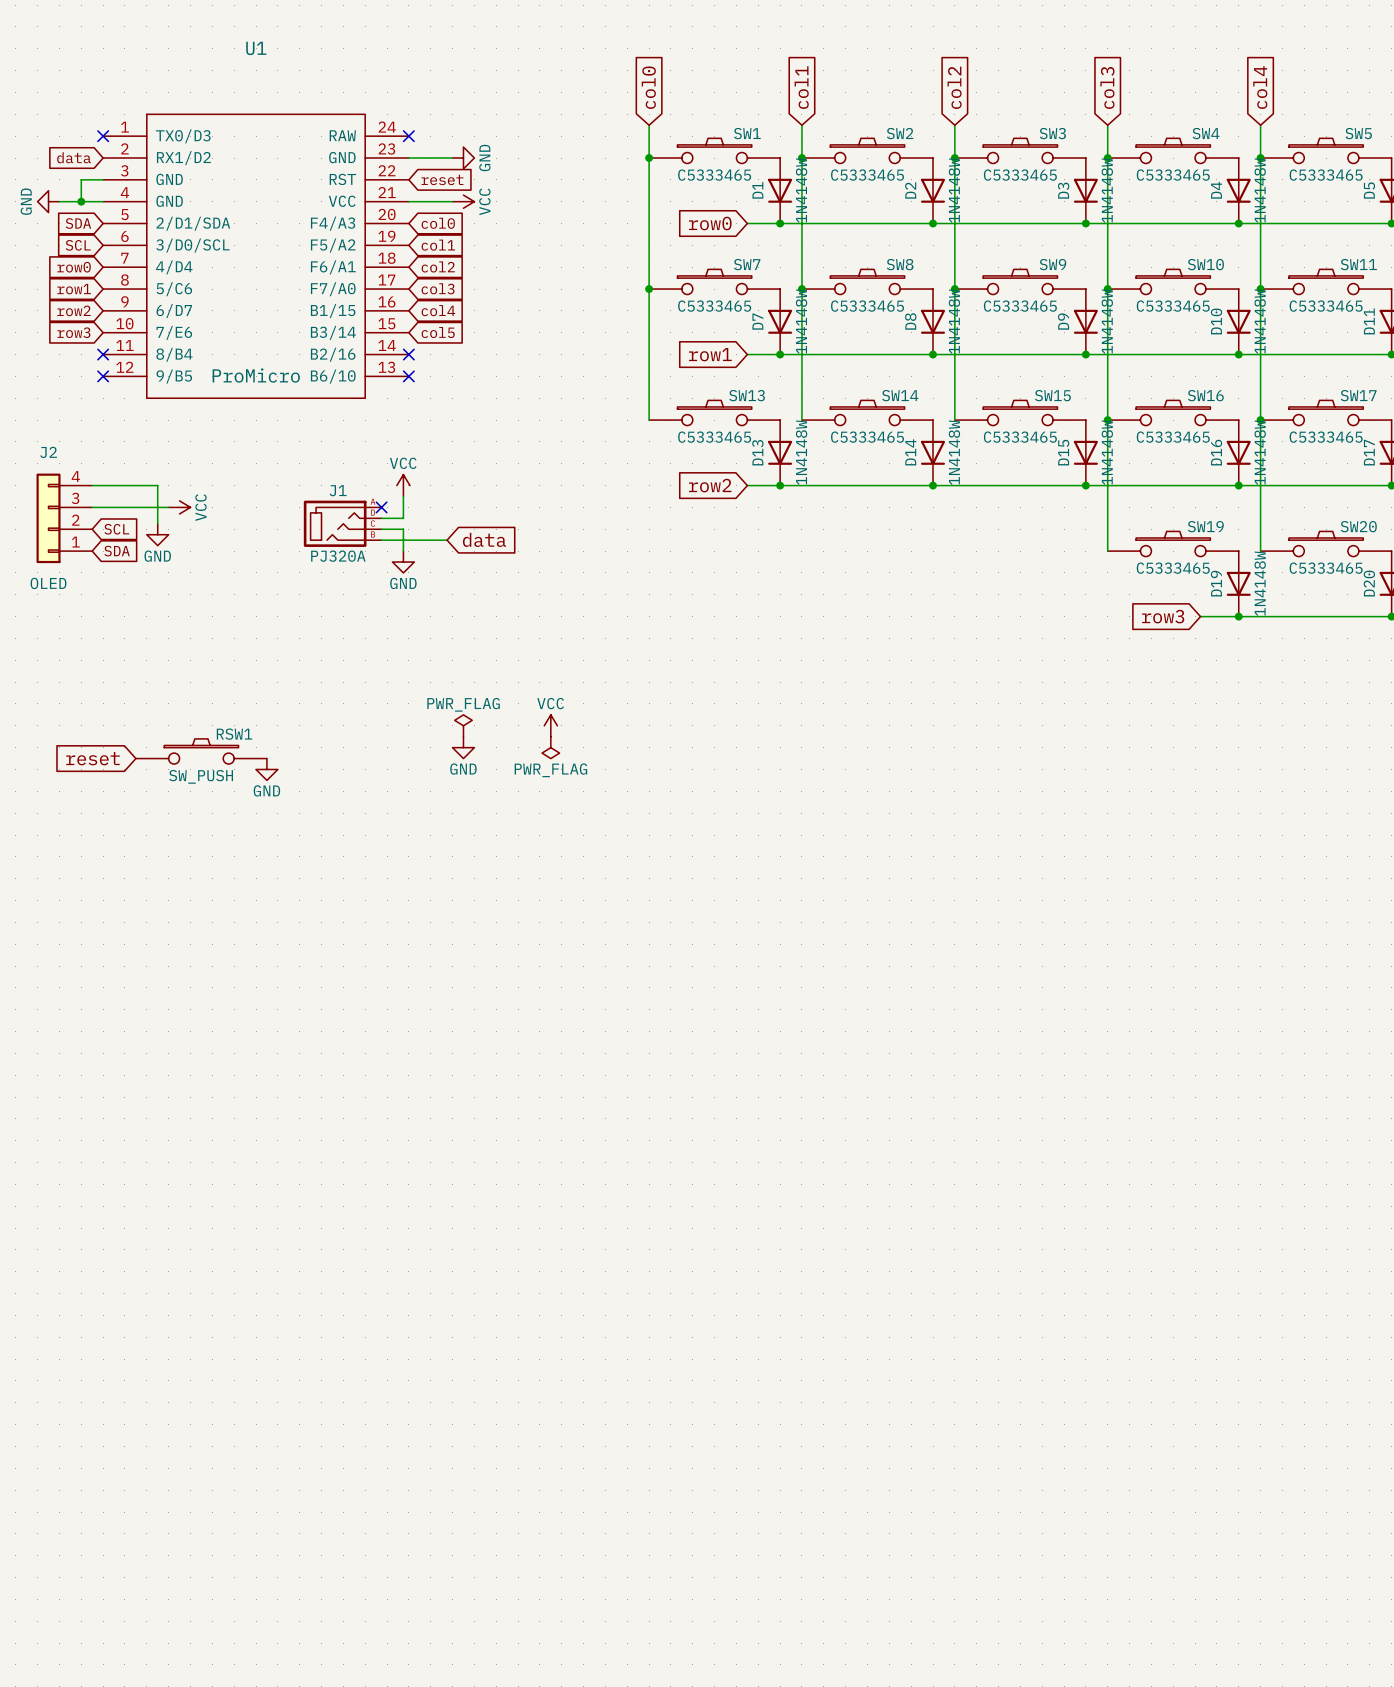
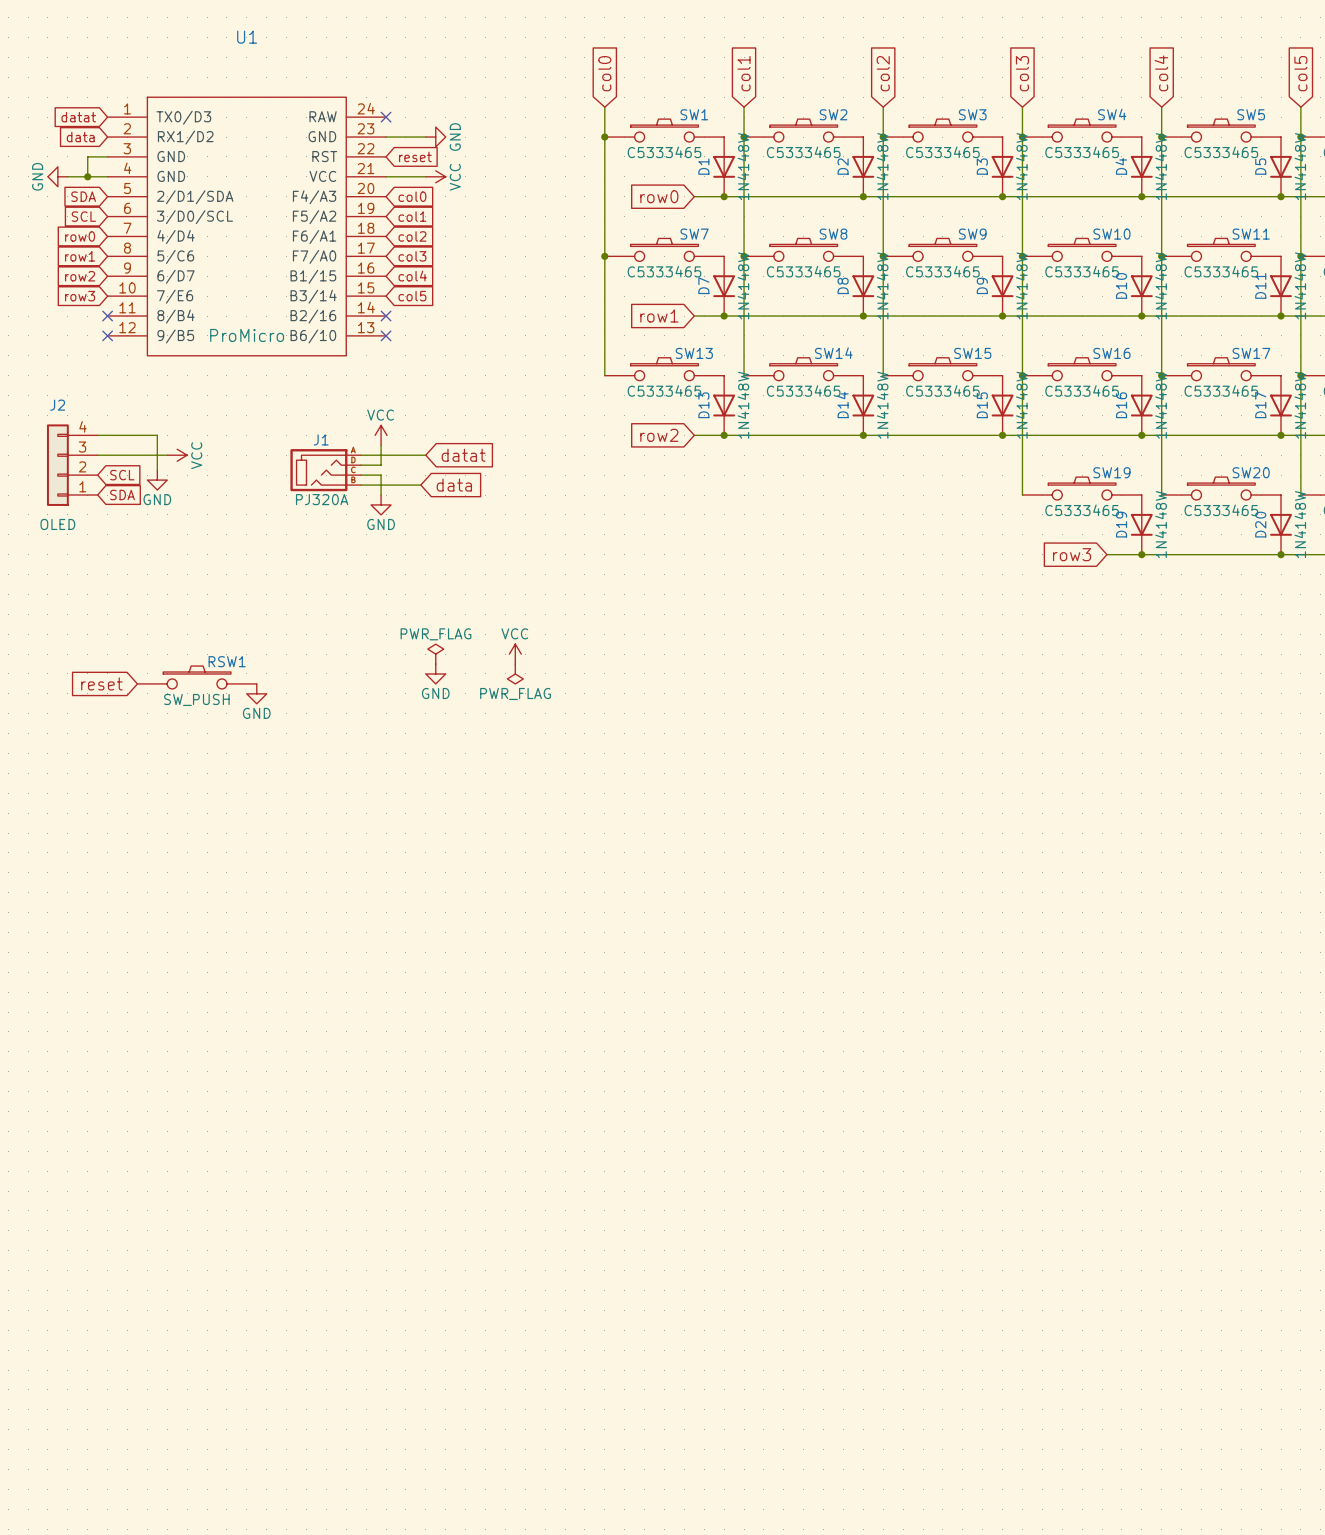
global label: none -> datat (78, 117)
no-connect mark: (103, 136) -> none
wire: none -> (361, 455) (425, 455)
no-connect mark: (381, 507) -> none
global label: none -> datat (463, 455)

